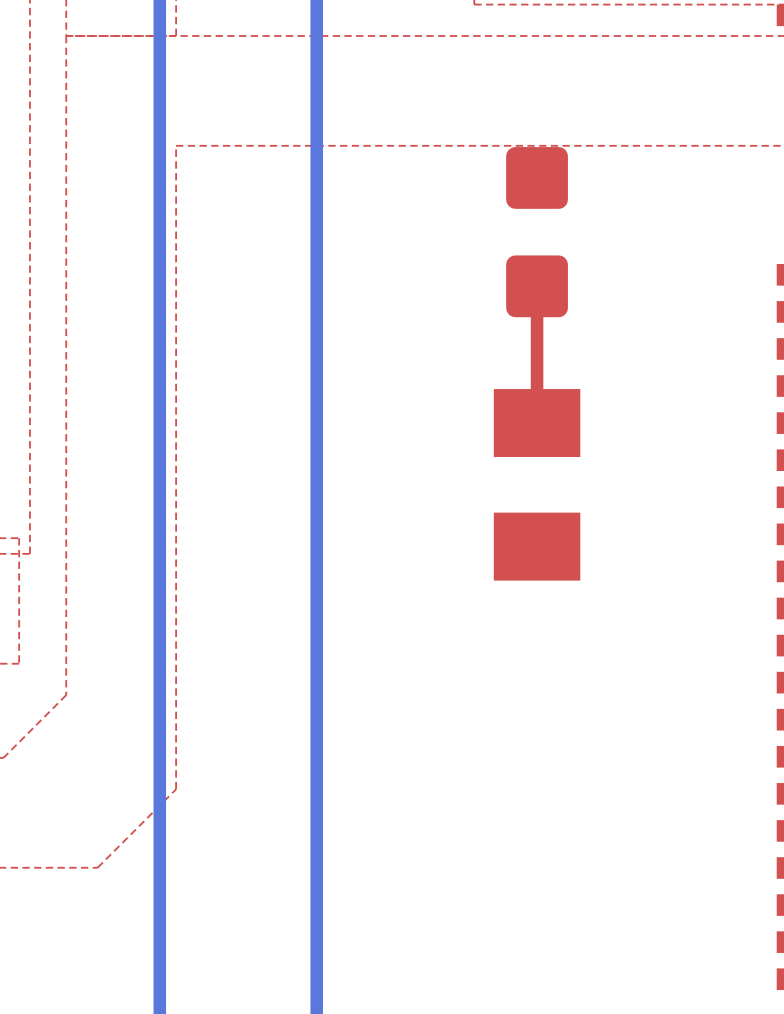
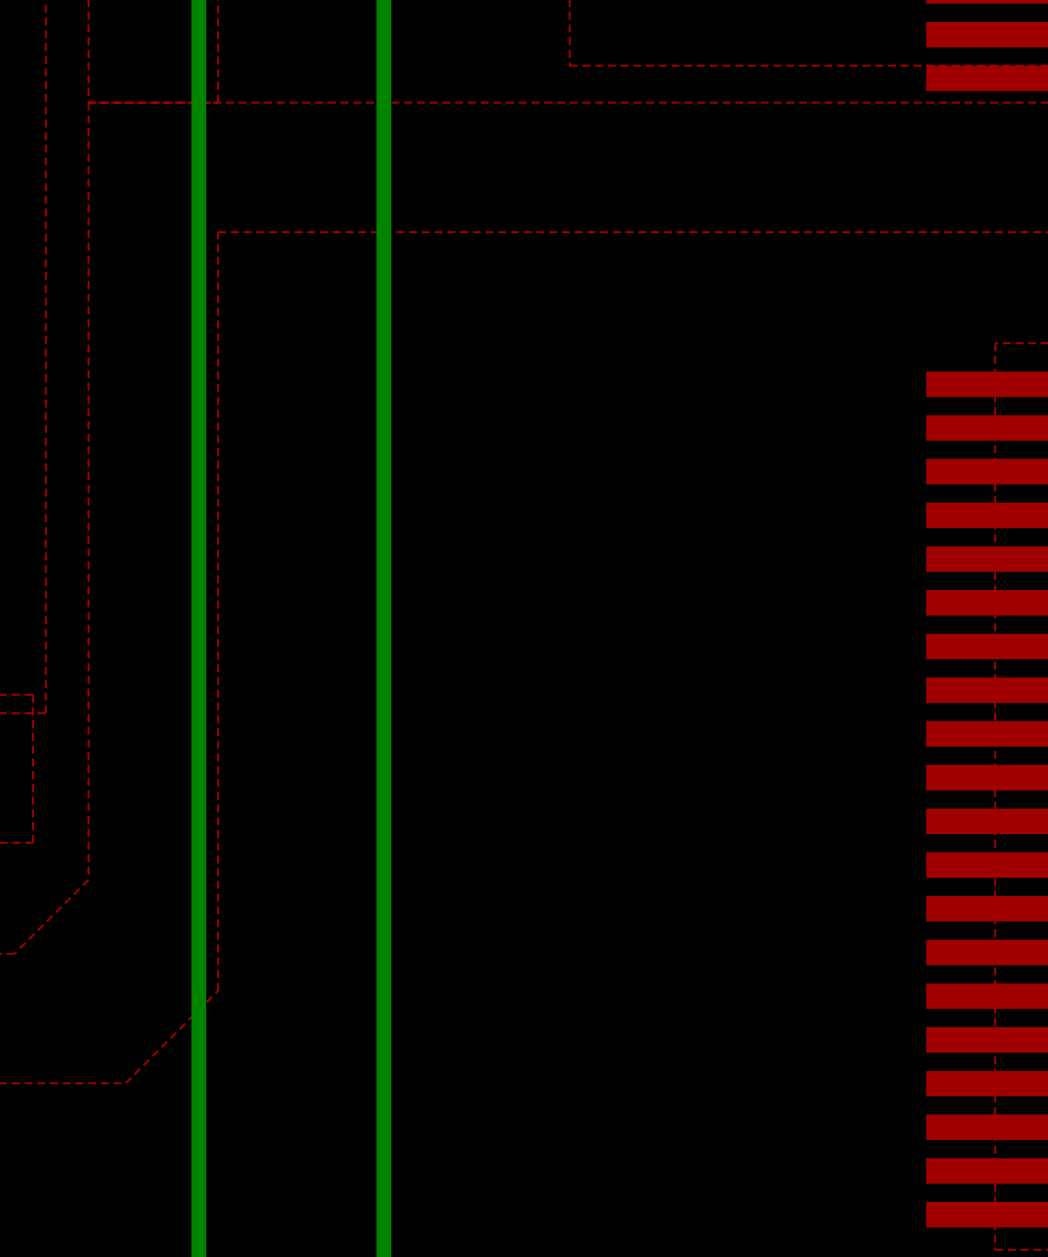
part: (537, 232) -> none
top track: (537, 286) (537, 423) -> none
part: (537, 484) -> none

